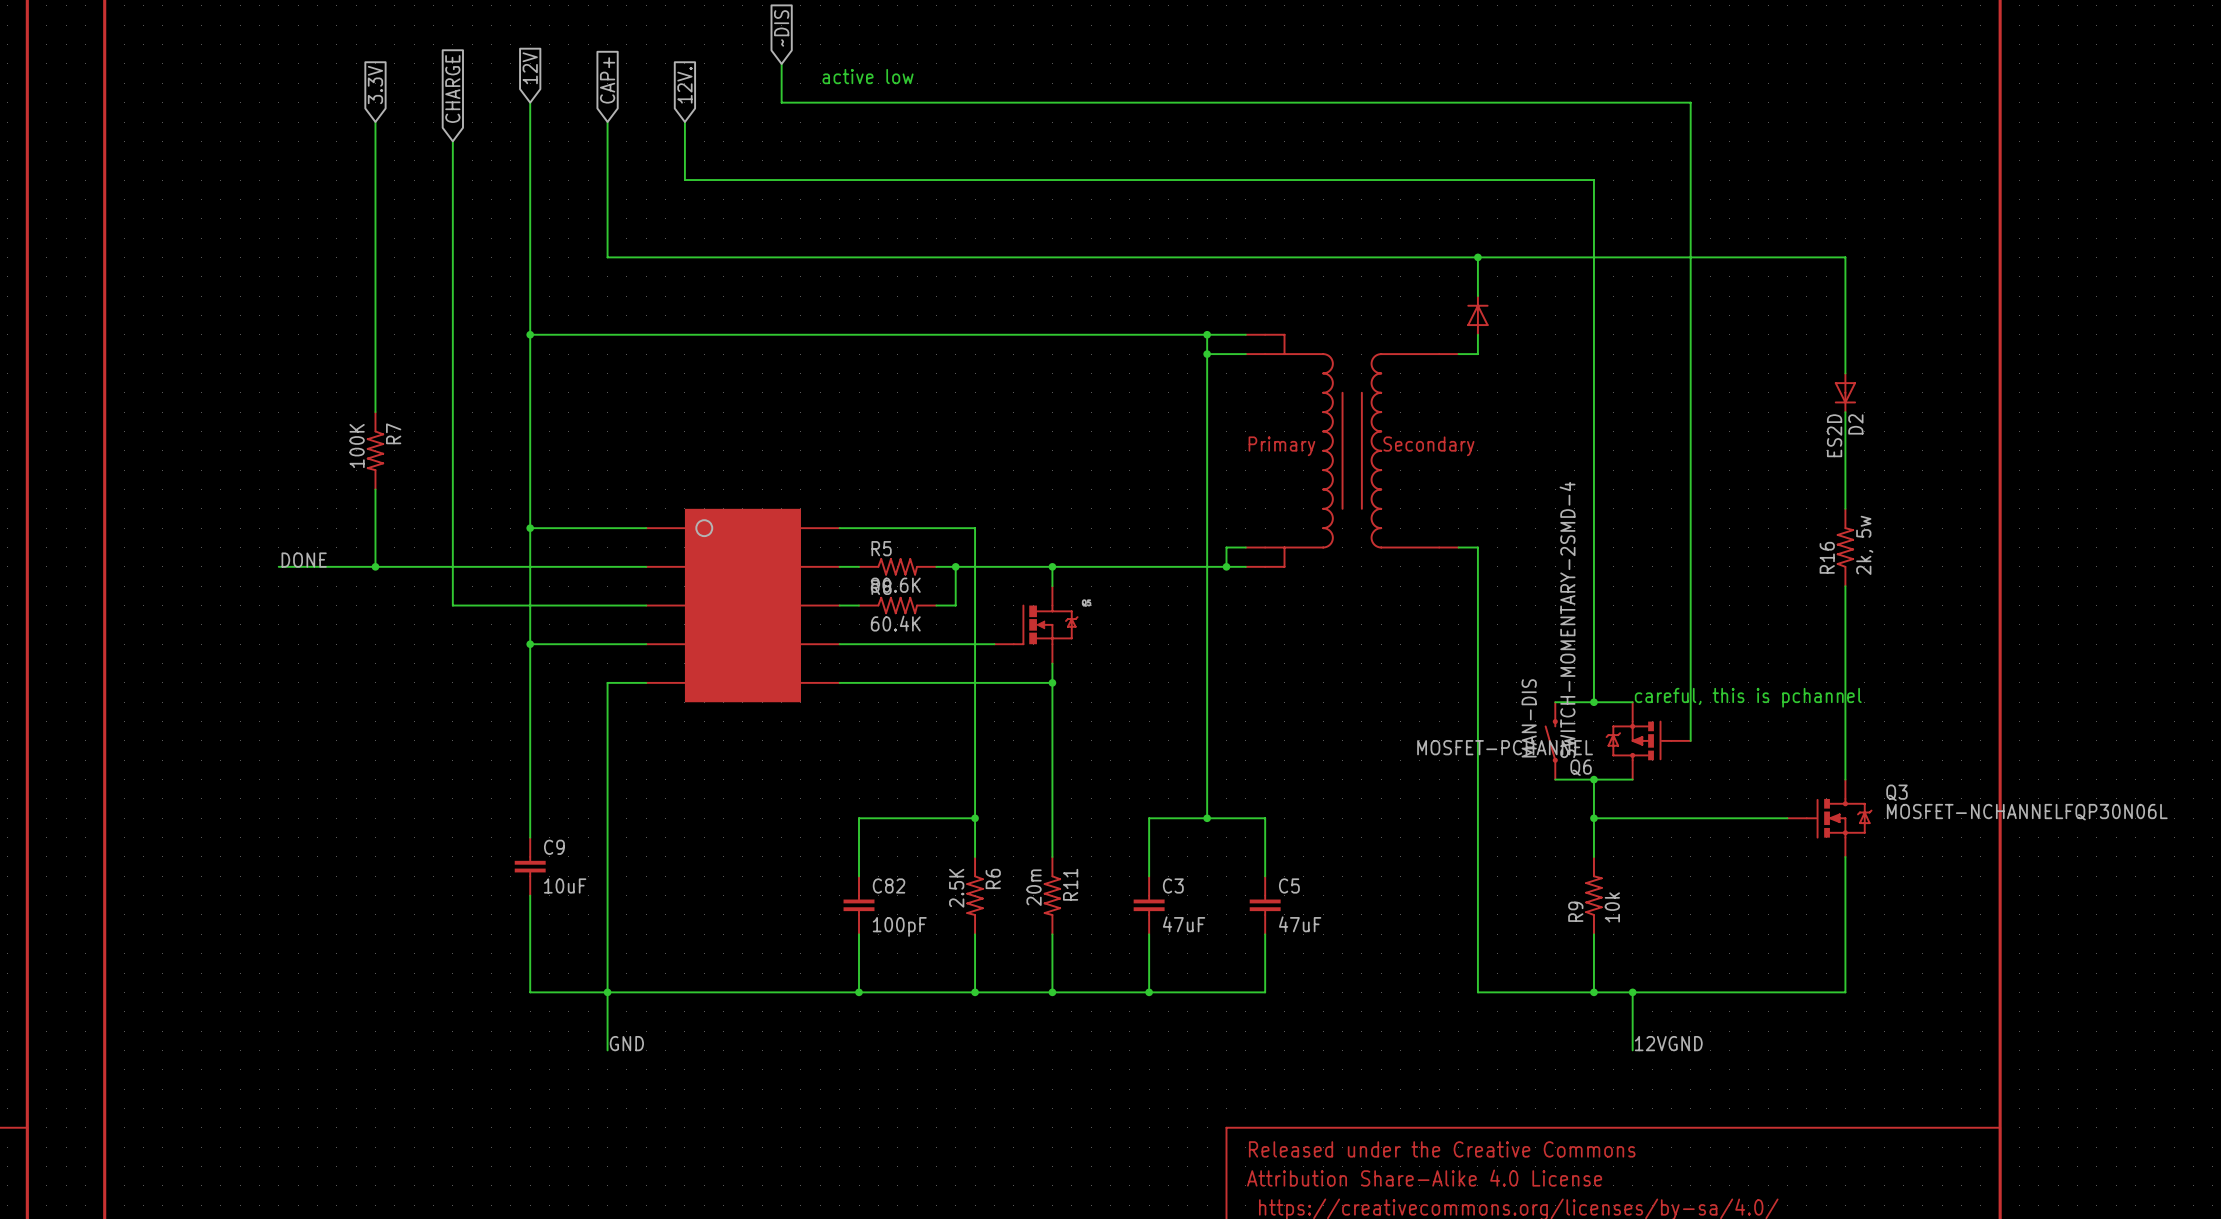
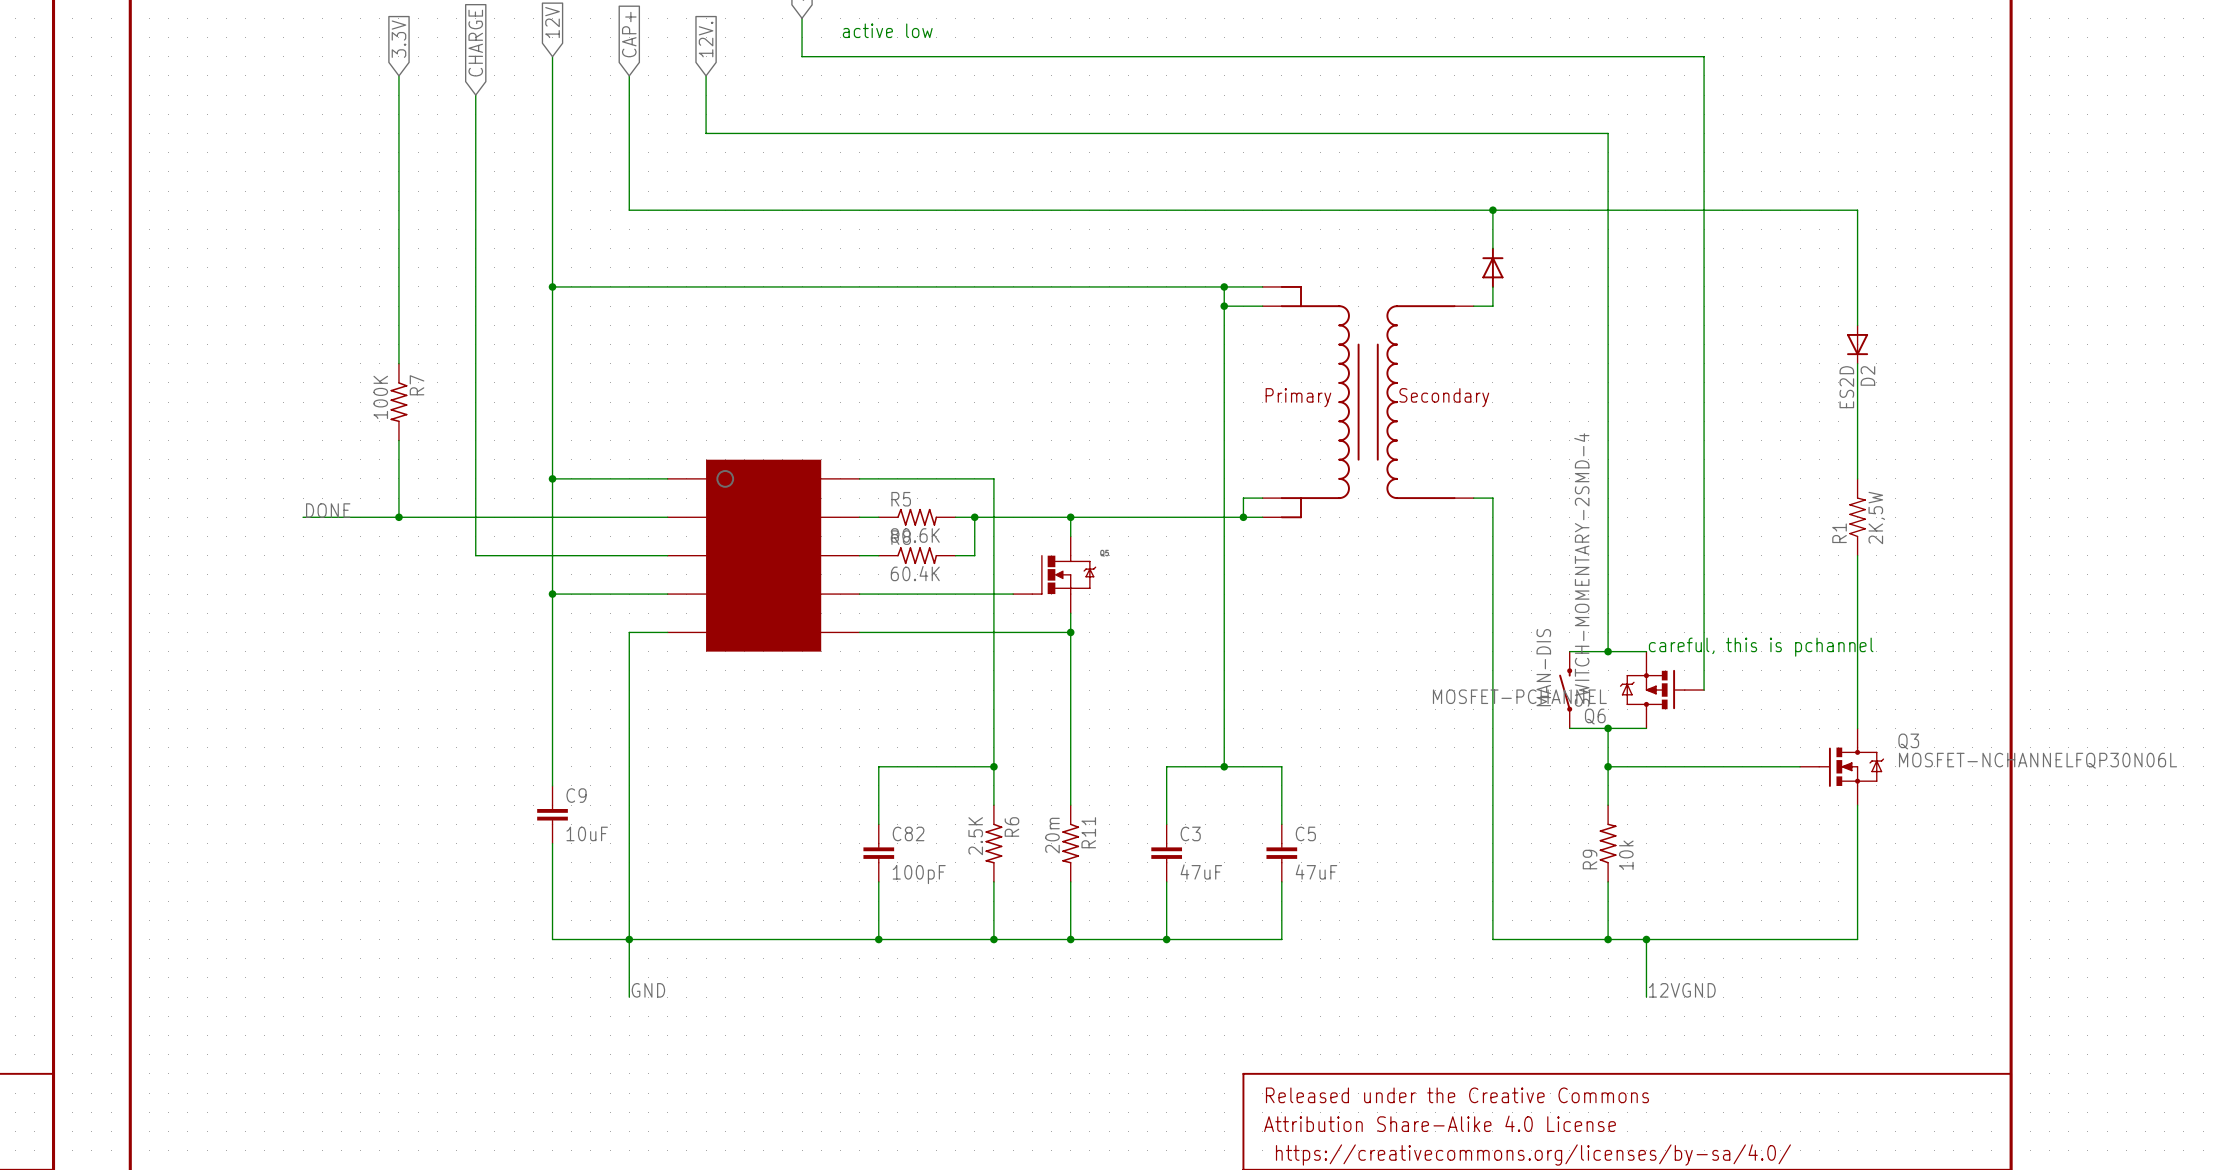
R16: 2k, 5w (1845, 547) -> none
R1: none -> 2K,5W (1857, 517)

